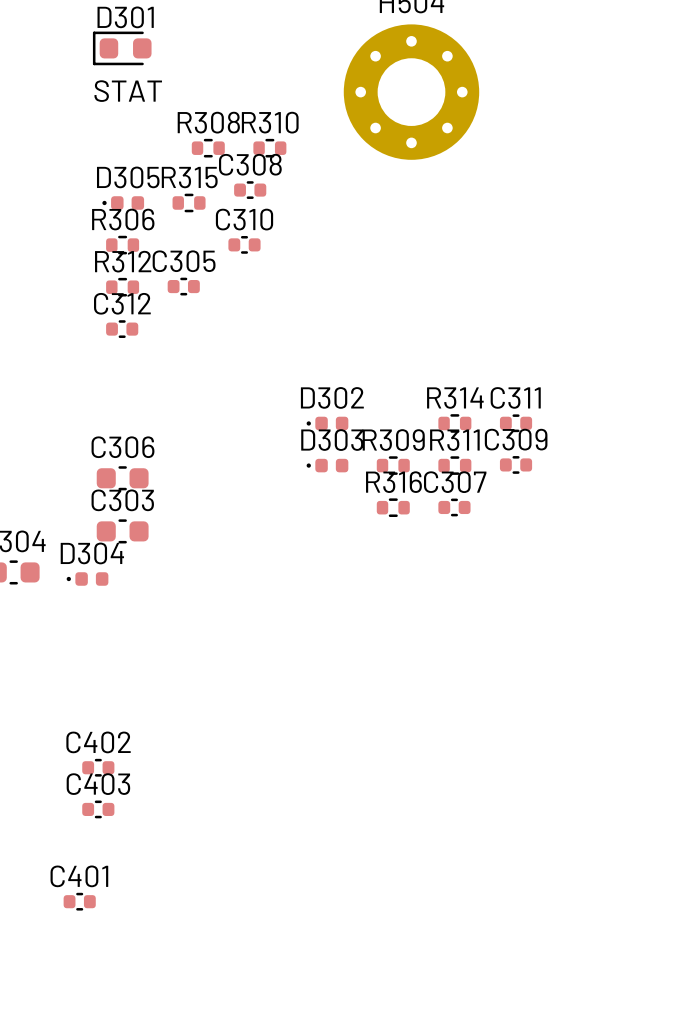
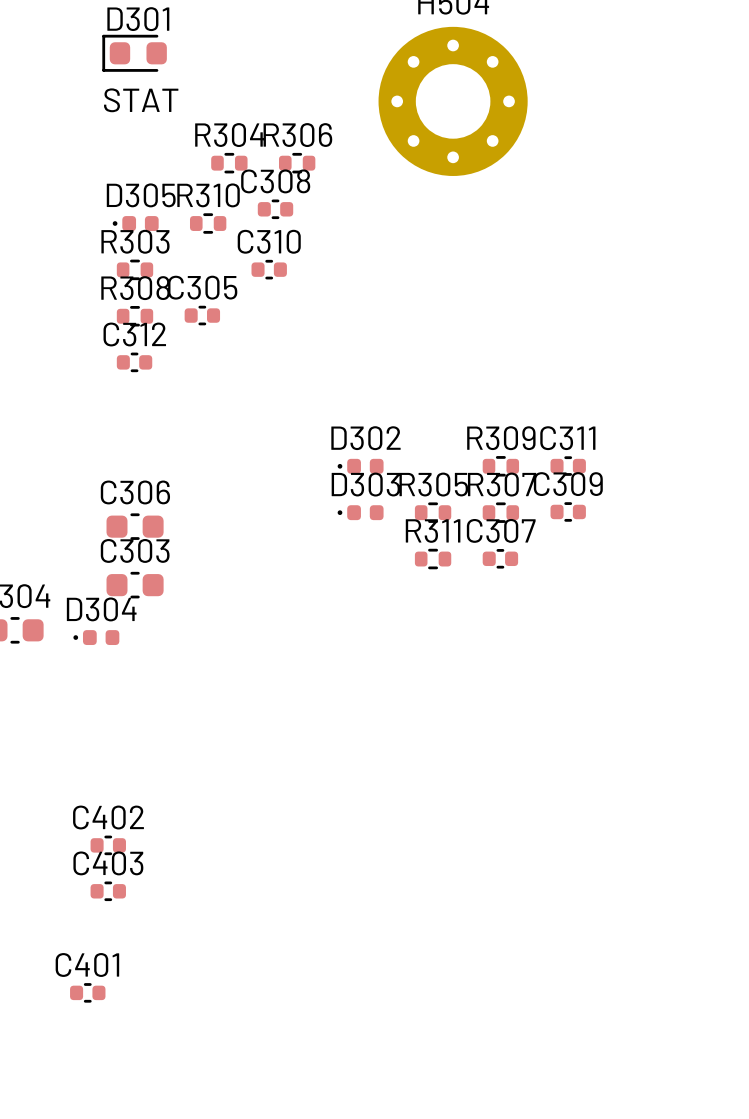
R308 name: R308 (208, 122) -> R304 (229, 135)
R310 name: R310 (270, 122) -> R306 (297, 135)
R315 name: R315 (189, 177) -> R310 (208, 195)
R306 name: R306 (123, 219) -> R303 (135, 241)
R312 name: R312 (123, 261) -> R308 (135, 288)
R314 name: R314 (455, 398) -> R309 (501, 438)
R309 name: R309 (393, 440) -> R305 (433, 484)
R311 name: R311 (454, 440) -> R307 (502, 484)
R316 name: R316 (393, 482) -> R311 (433, 531)

